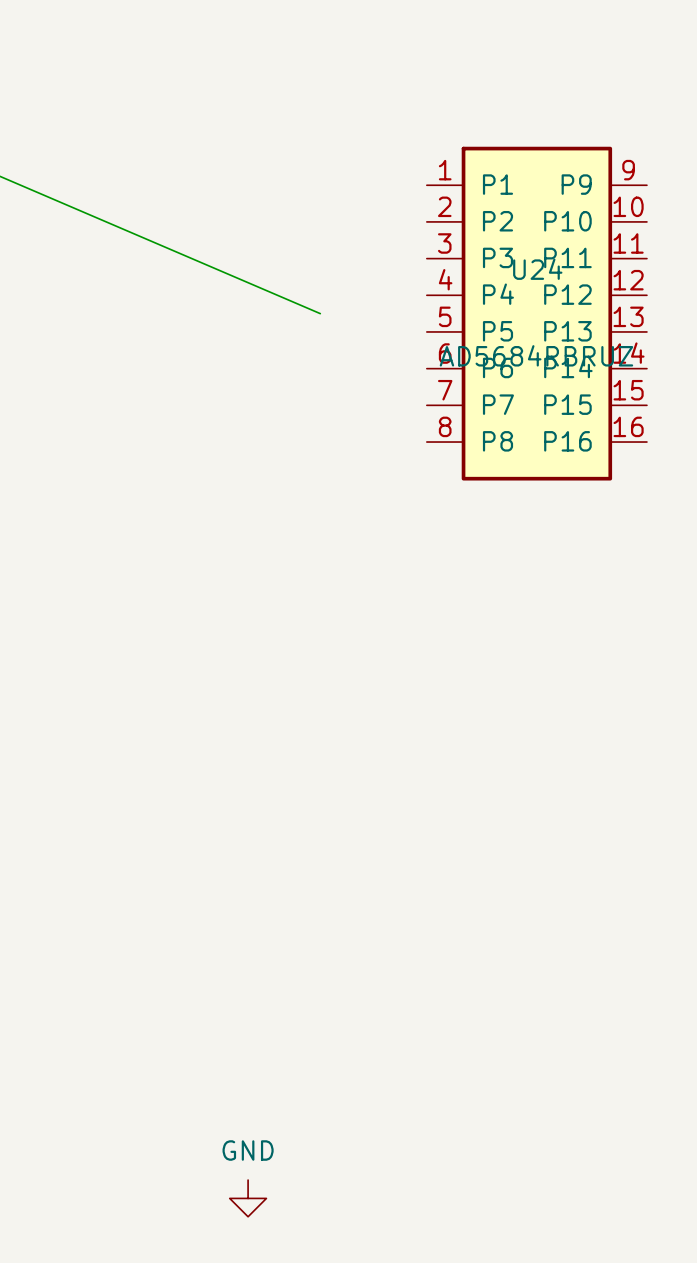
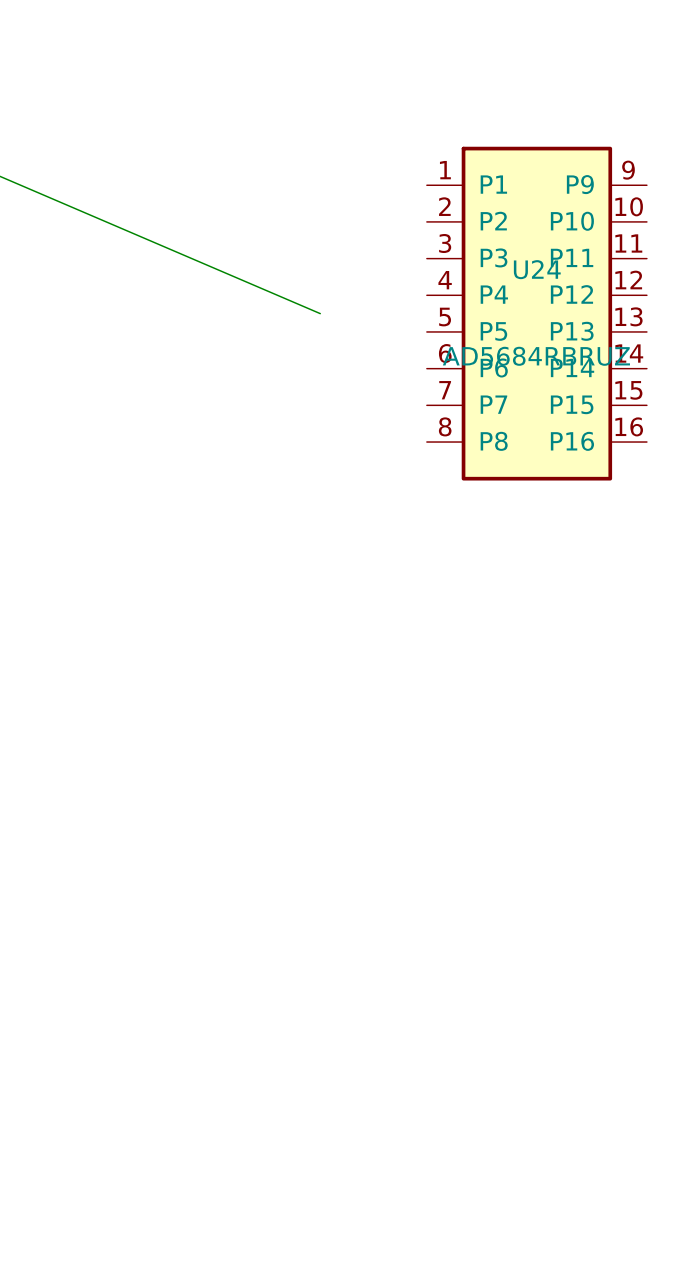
power symbol: GND (248, 1198) -> none

